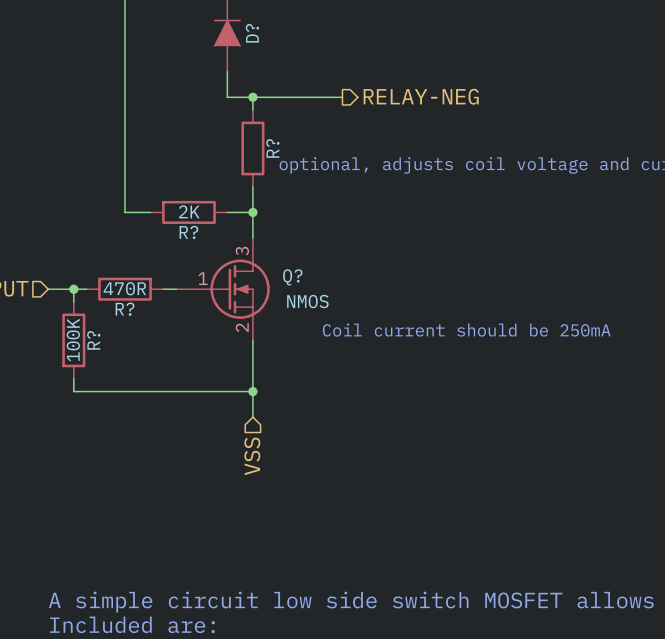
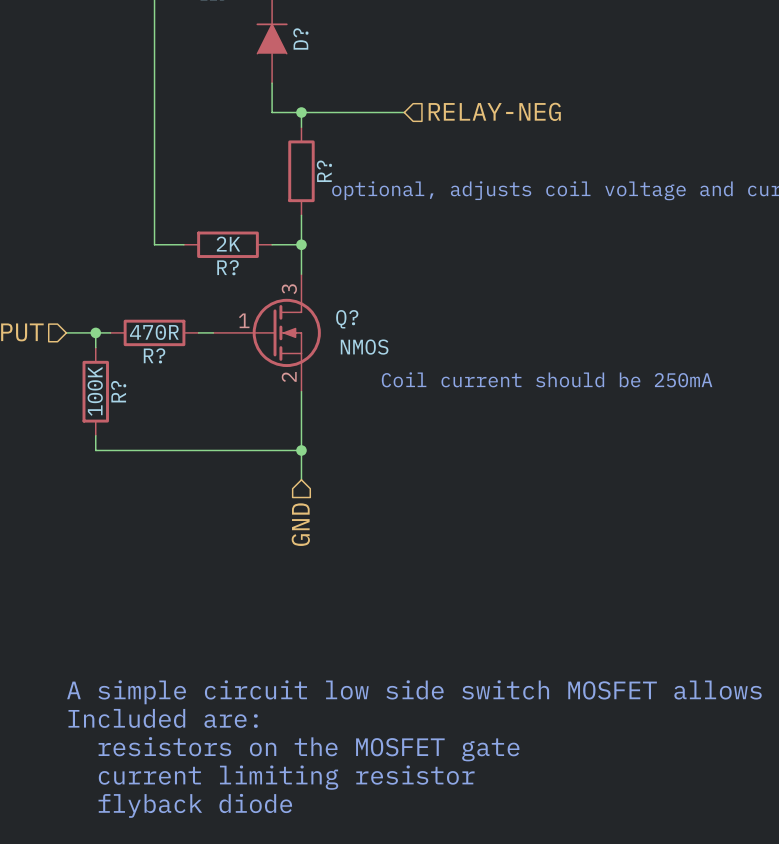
hierarchical label shape: output (421, 96) -> input (494, 111)
hierarchical label: VSS (252, 456) -> GND (300, 524)

